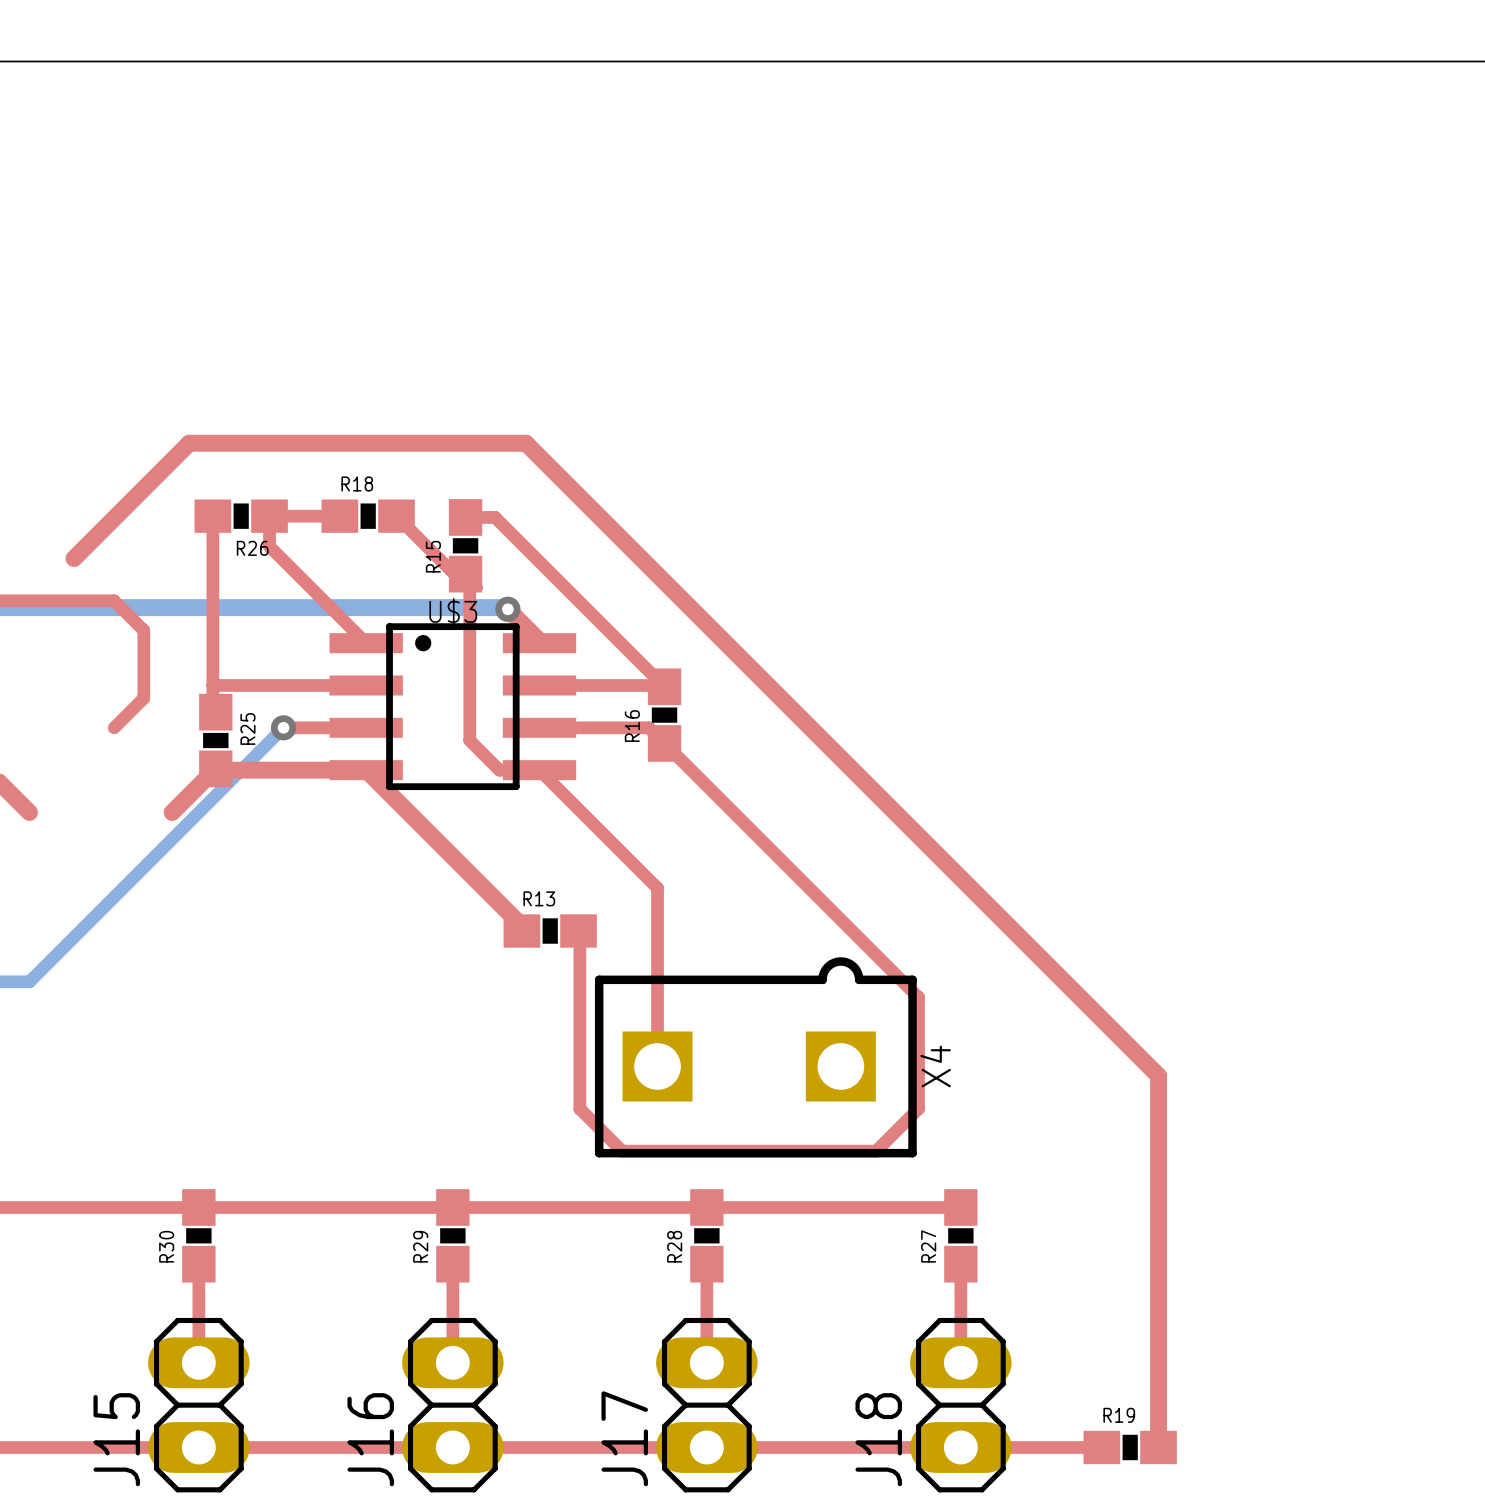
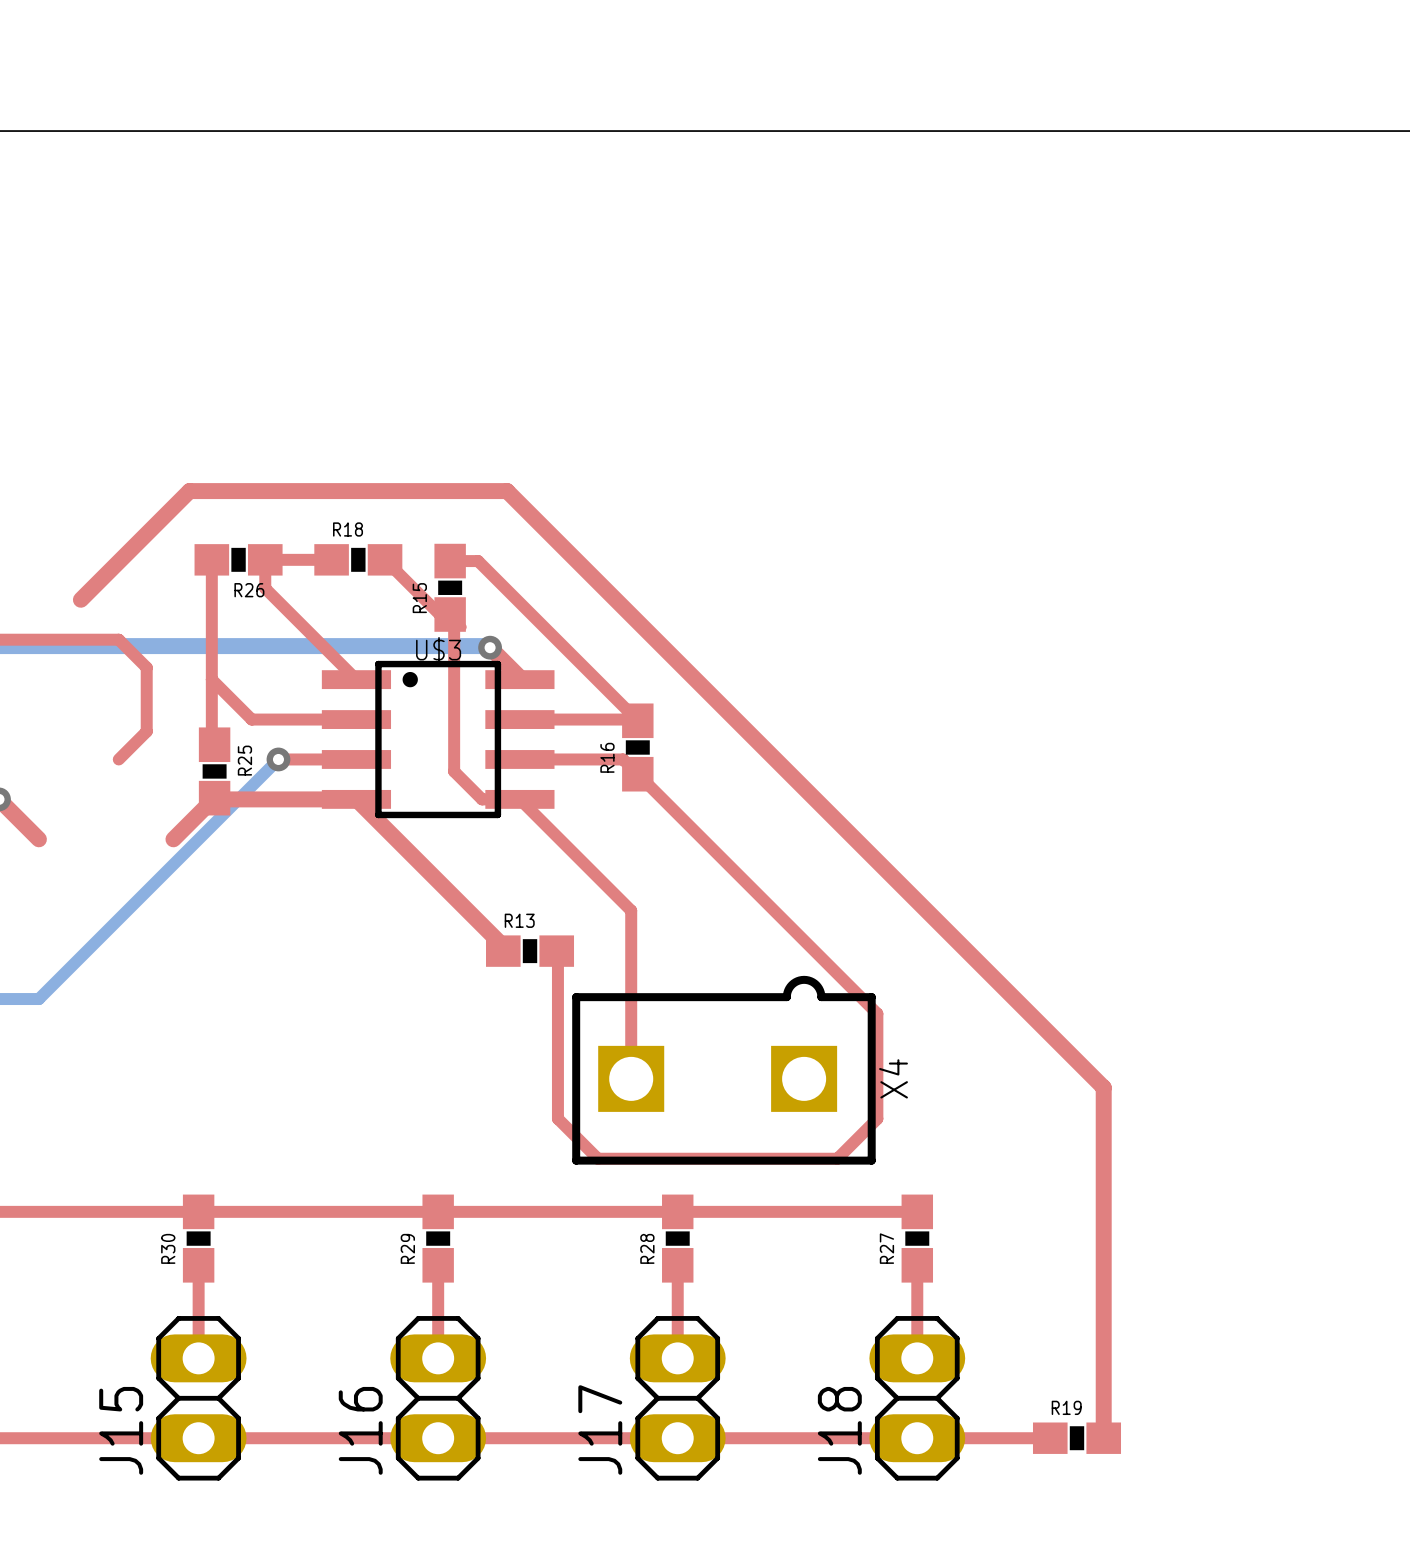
top track: (212, 685) (255, 685) -> (211, 679) (251, 719)

